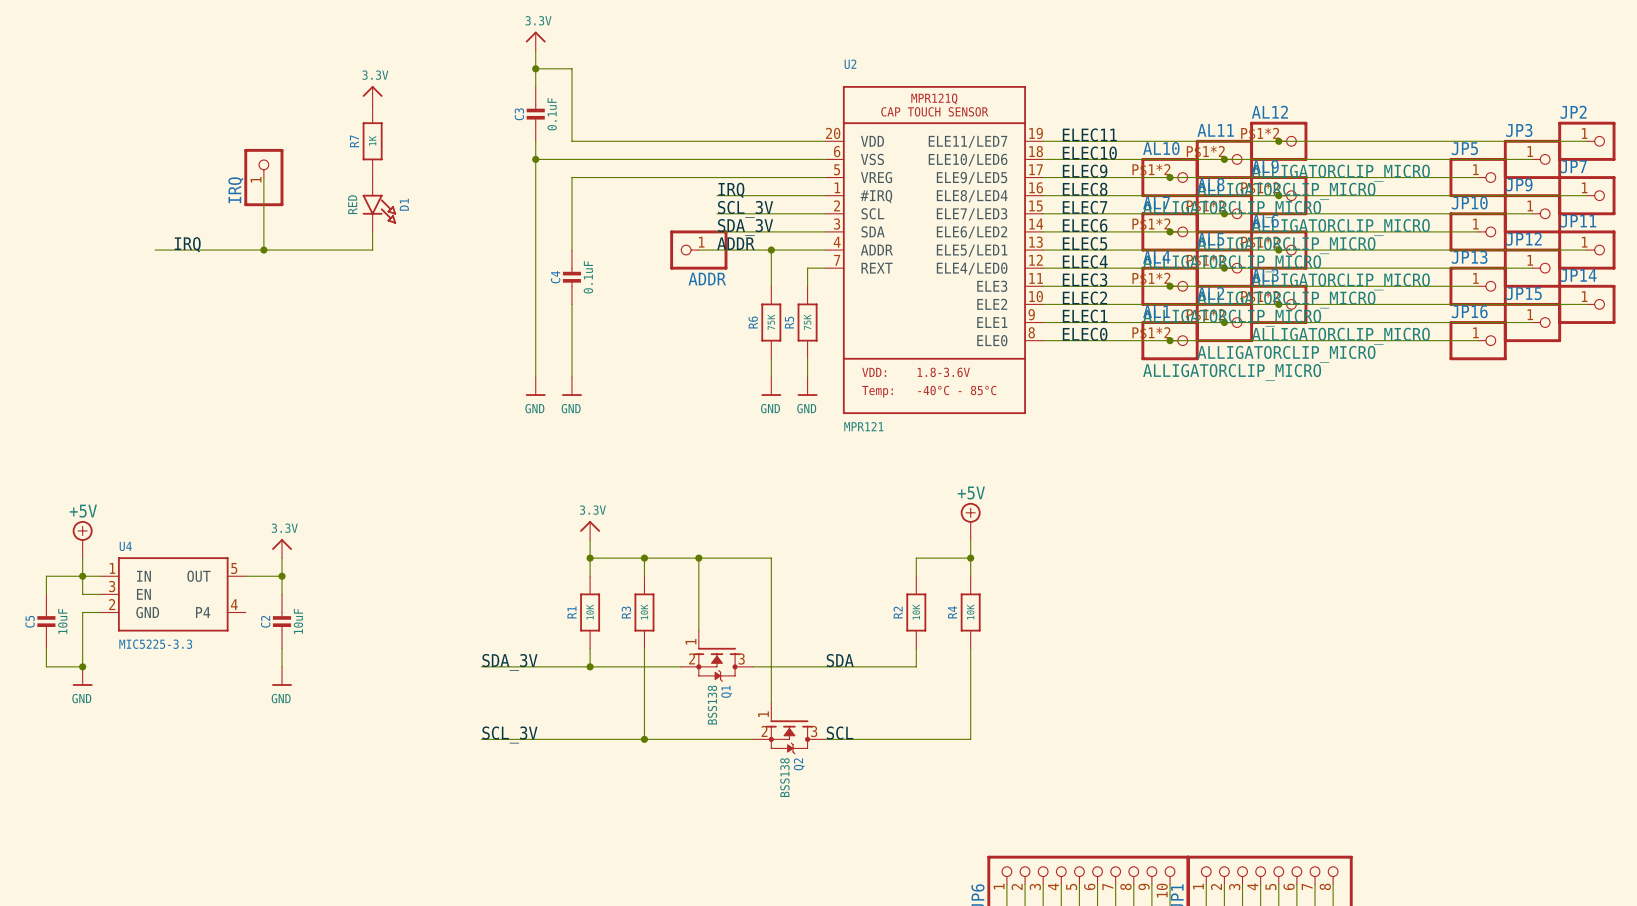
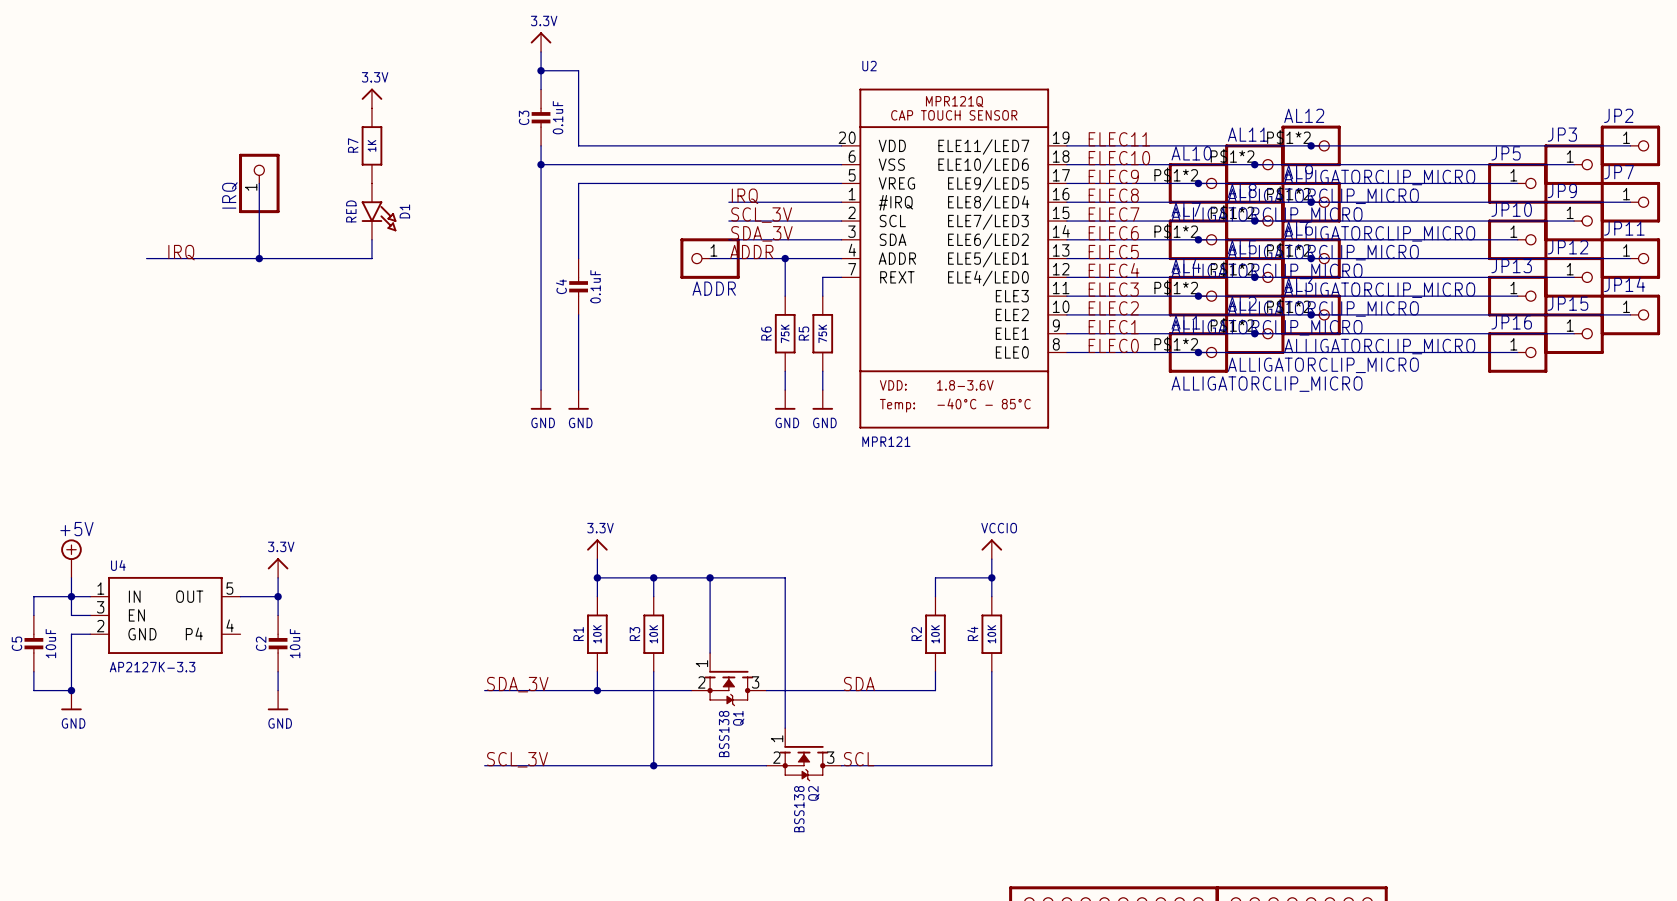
power symbol: +5V (970, 521) -> none
power symbol: none -> VCCIO (991, 549)
U4 value: MIC5225-3.3 (155, 644) -> AP2127K-3.3 (152, 667)

